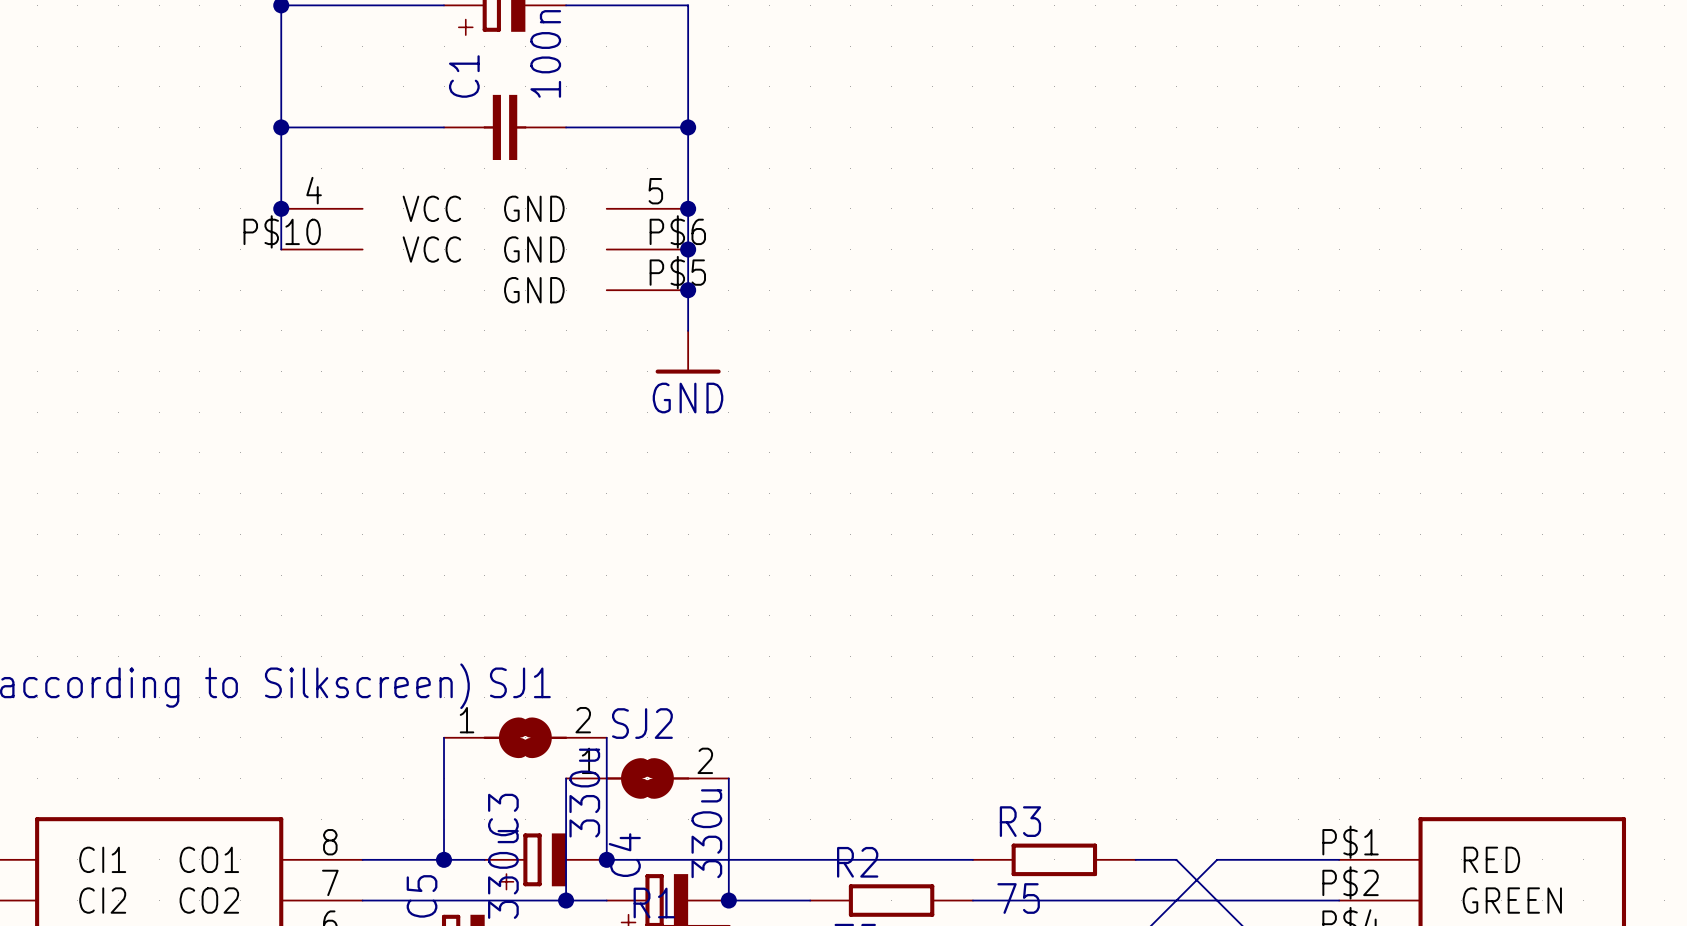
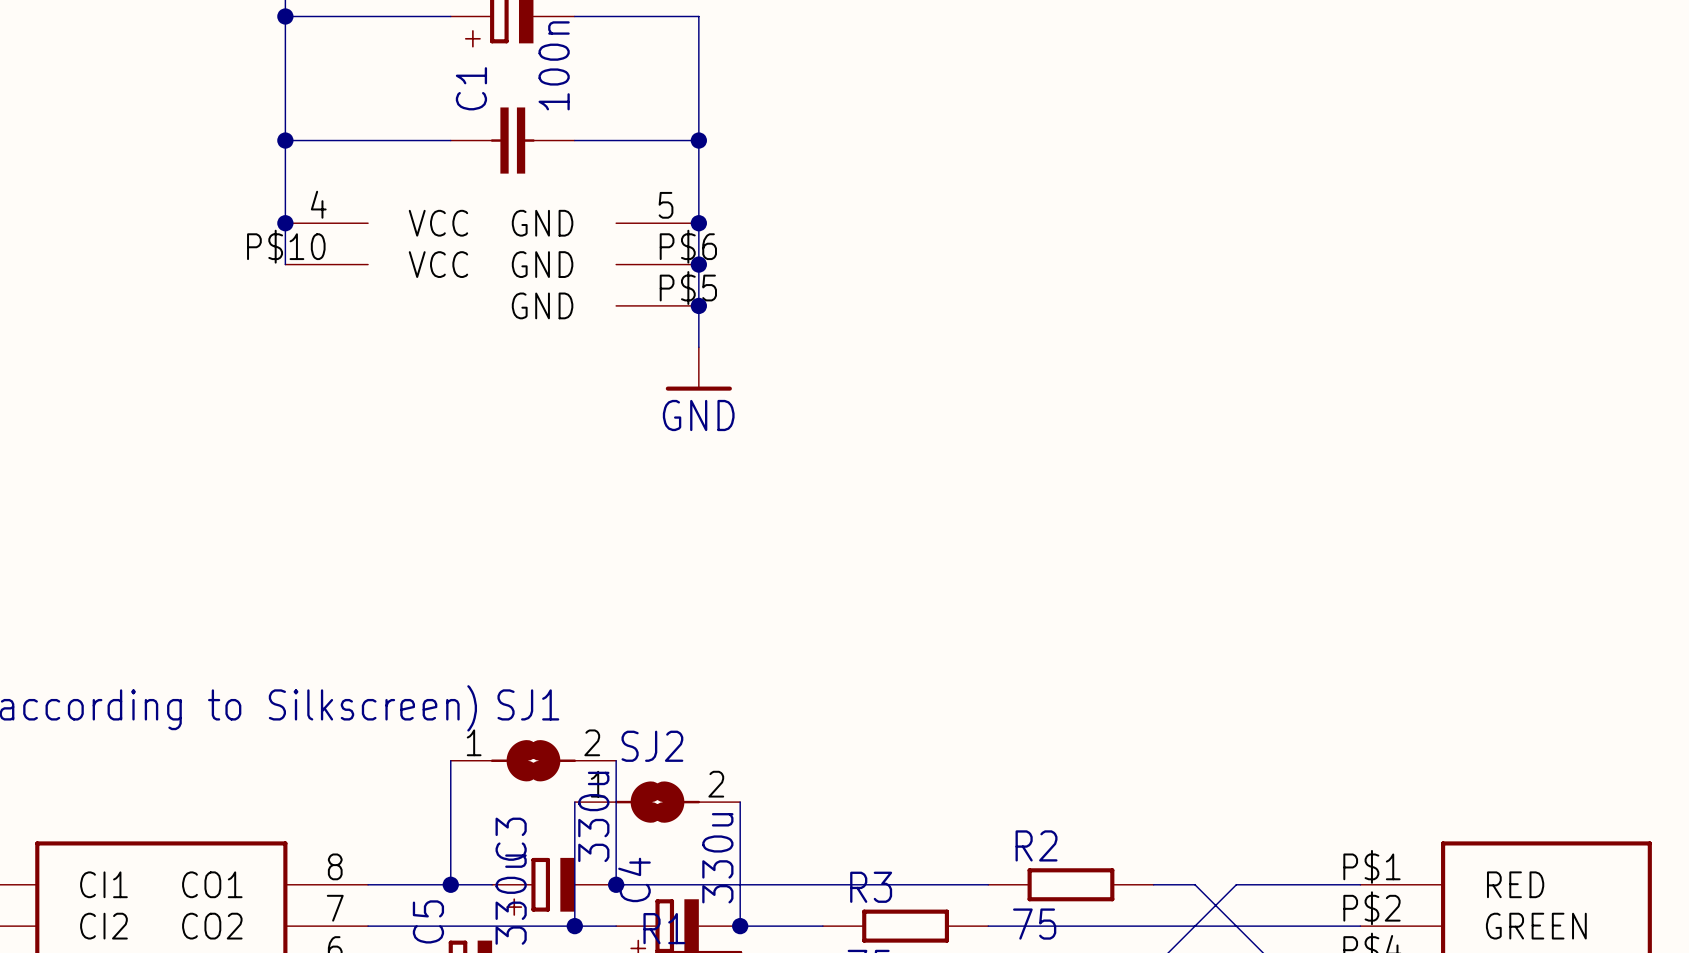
R3 name: R3 (1020, 821) -> R2 (1036, 845)
R2 name: R2 (857, 862) -> R3 (871, 887)

